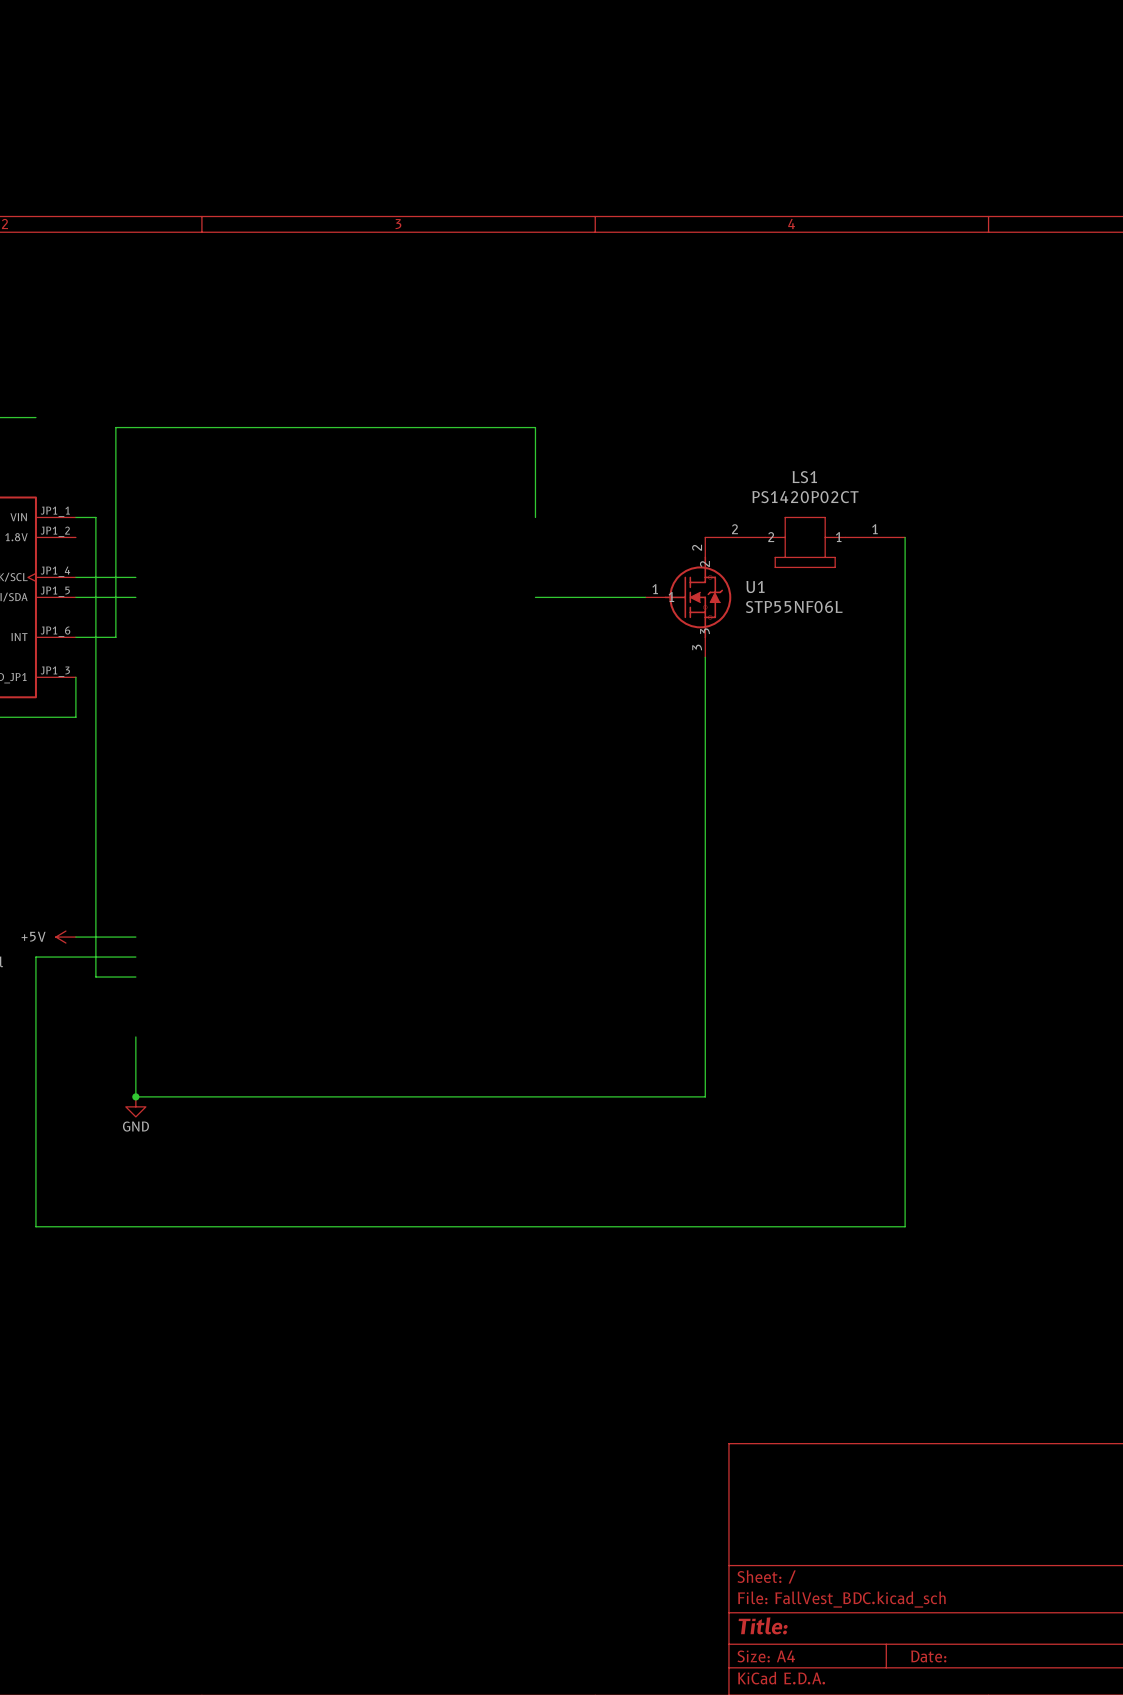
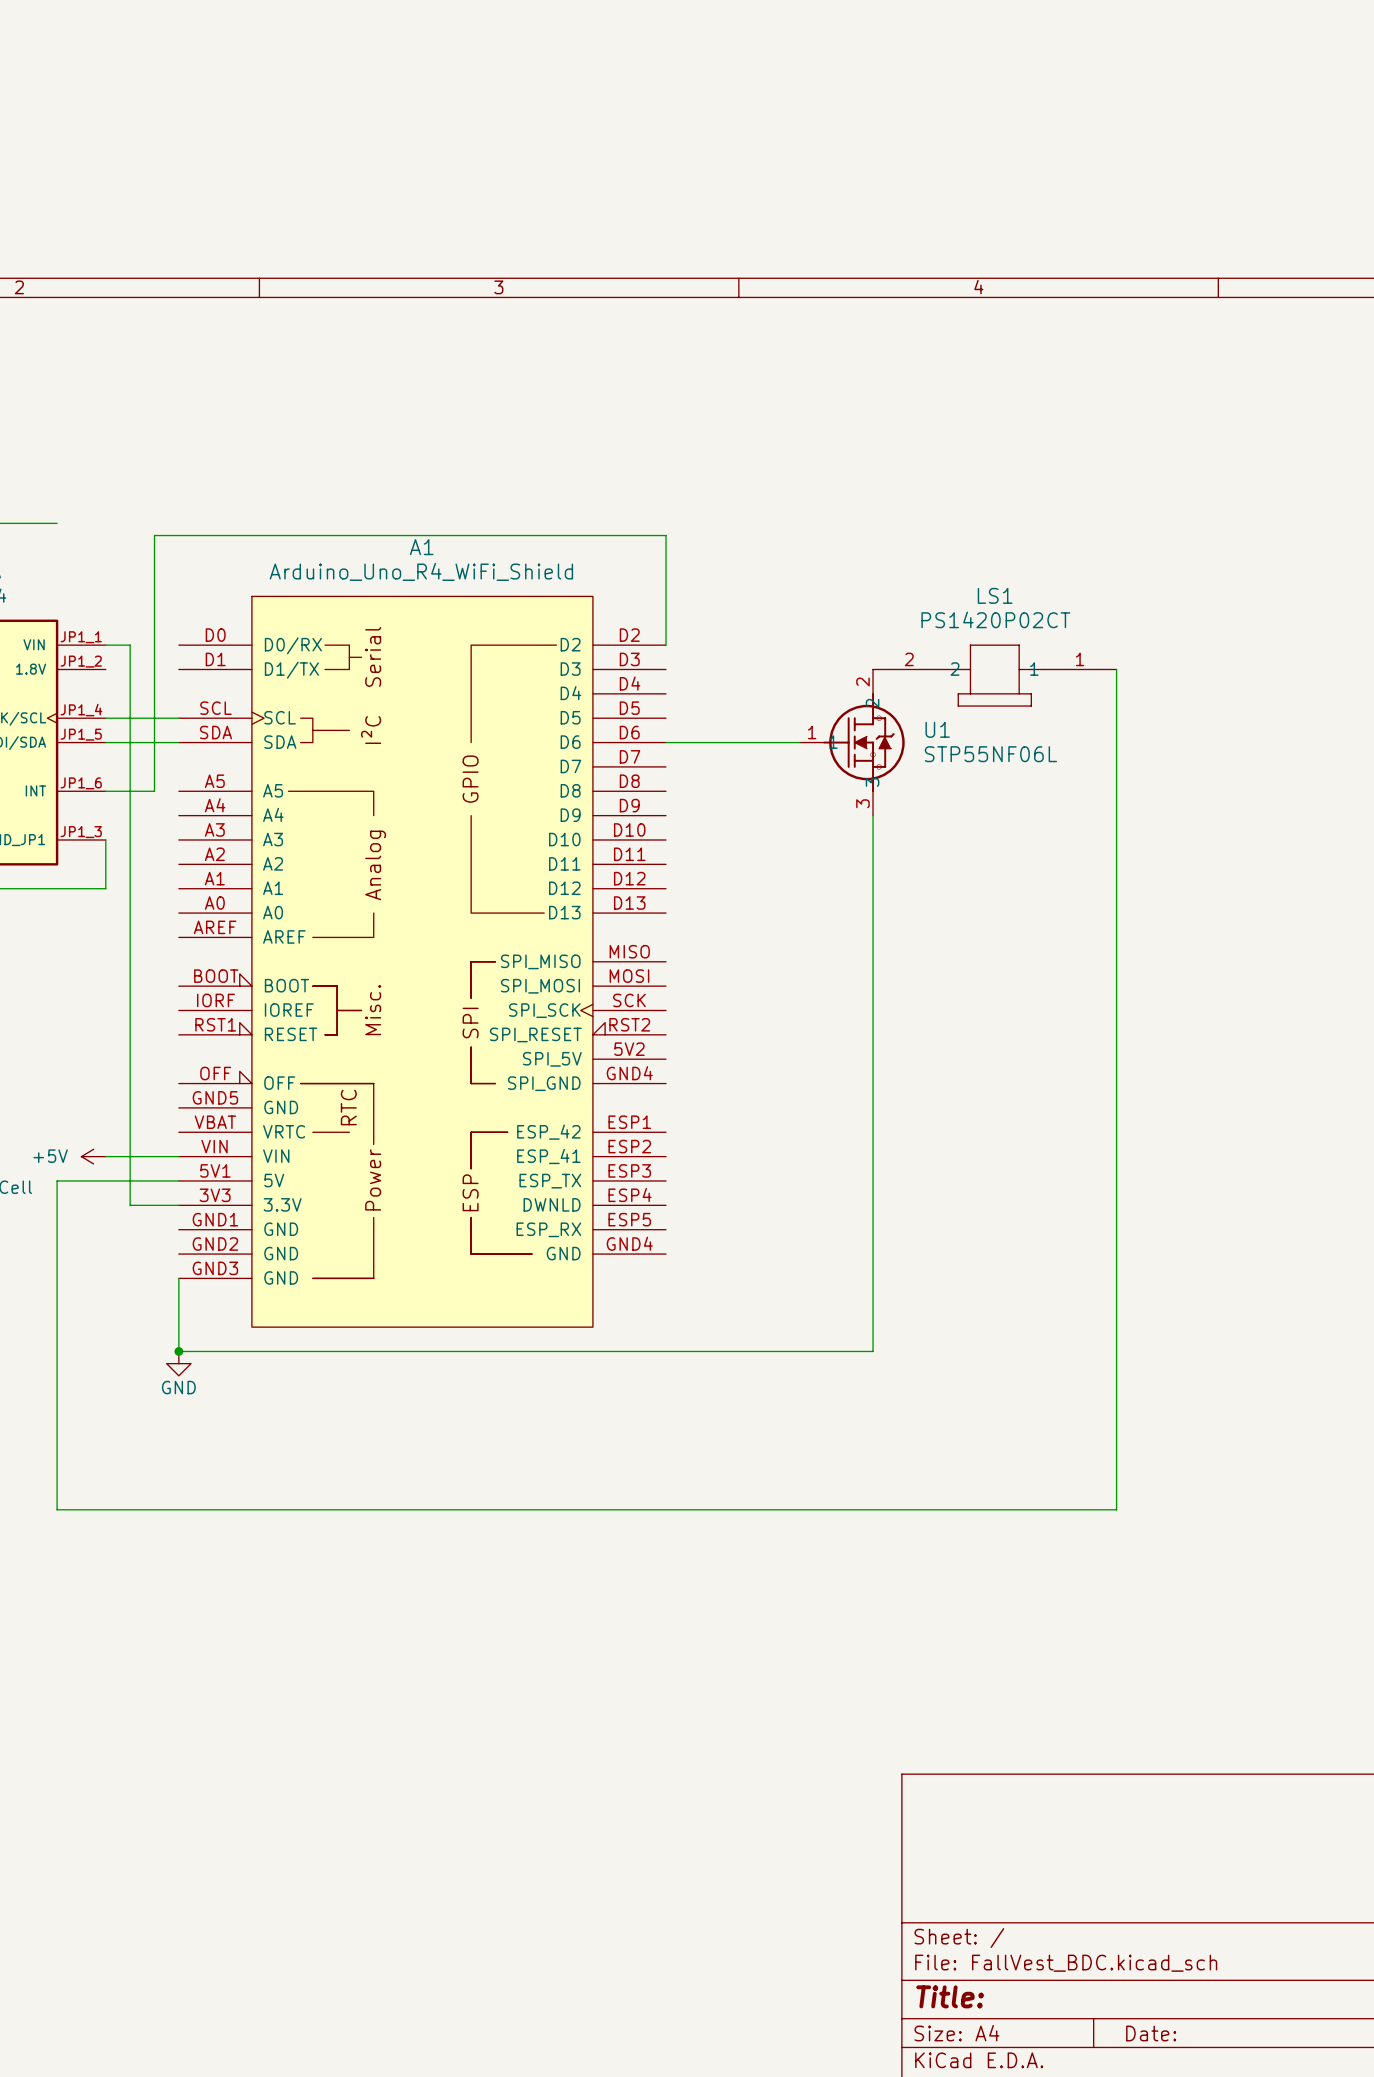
A1: none -> Arduino_Uno_R4_WiFi_Shield (422, 961)

